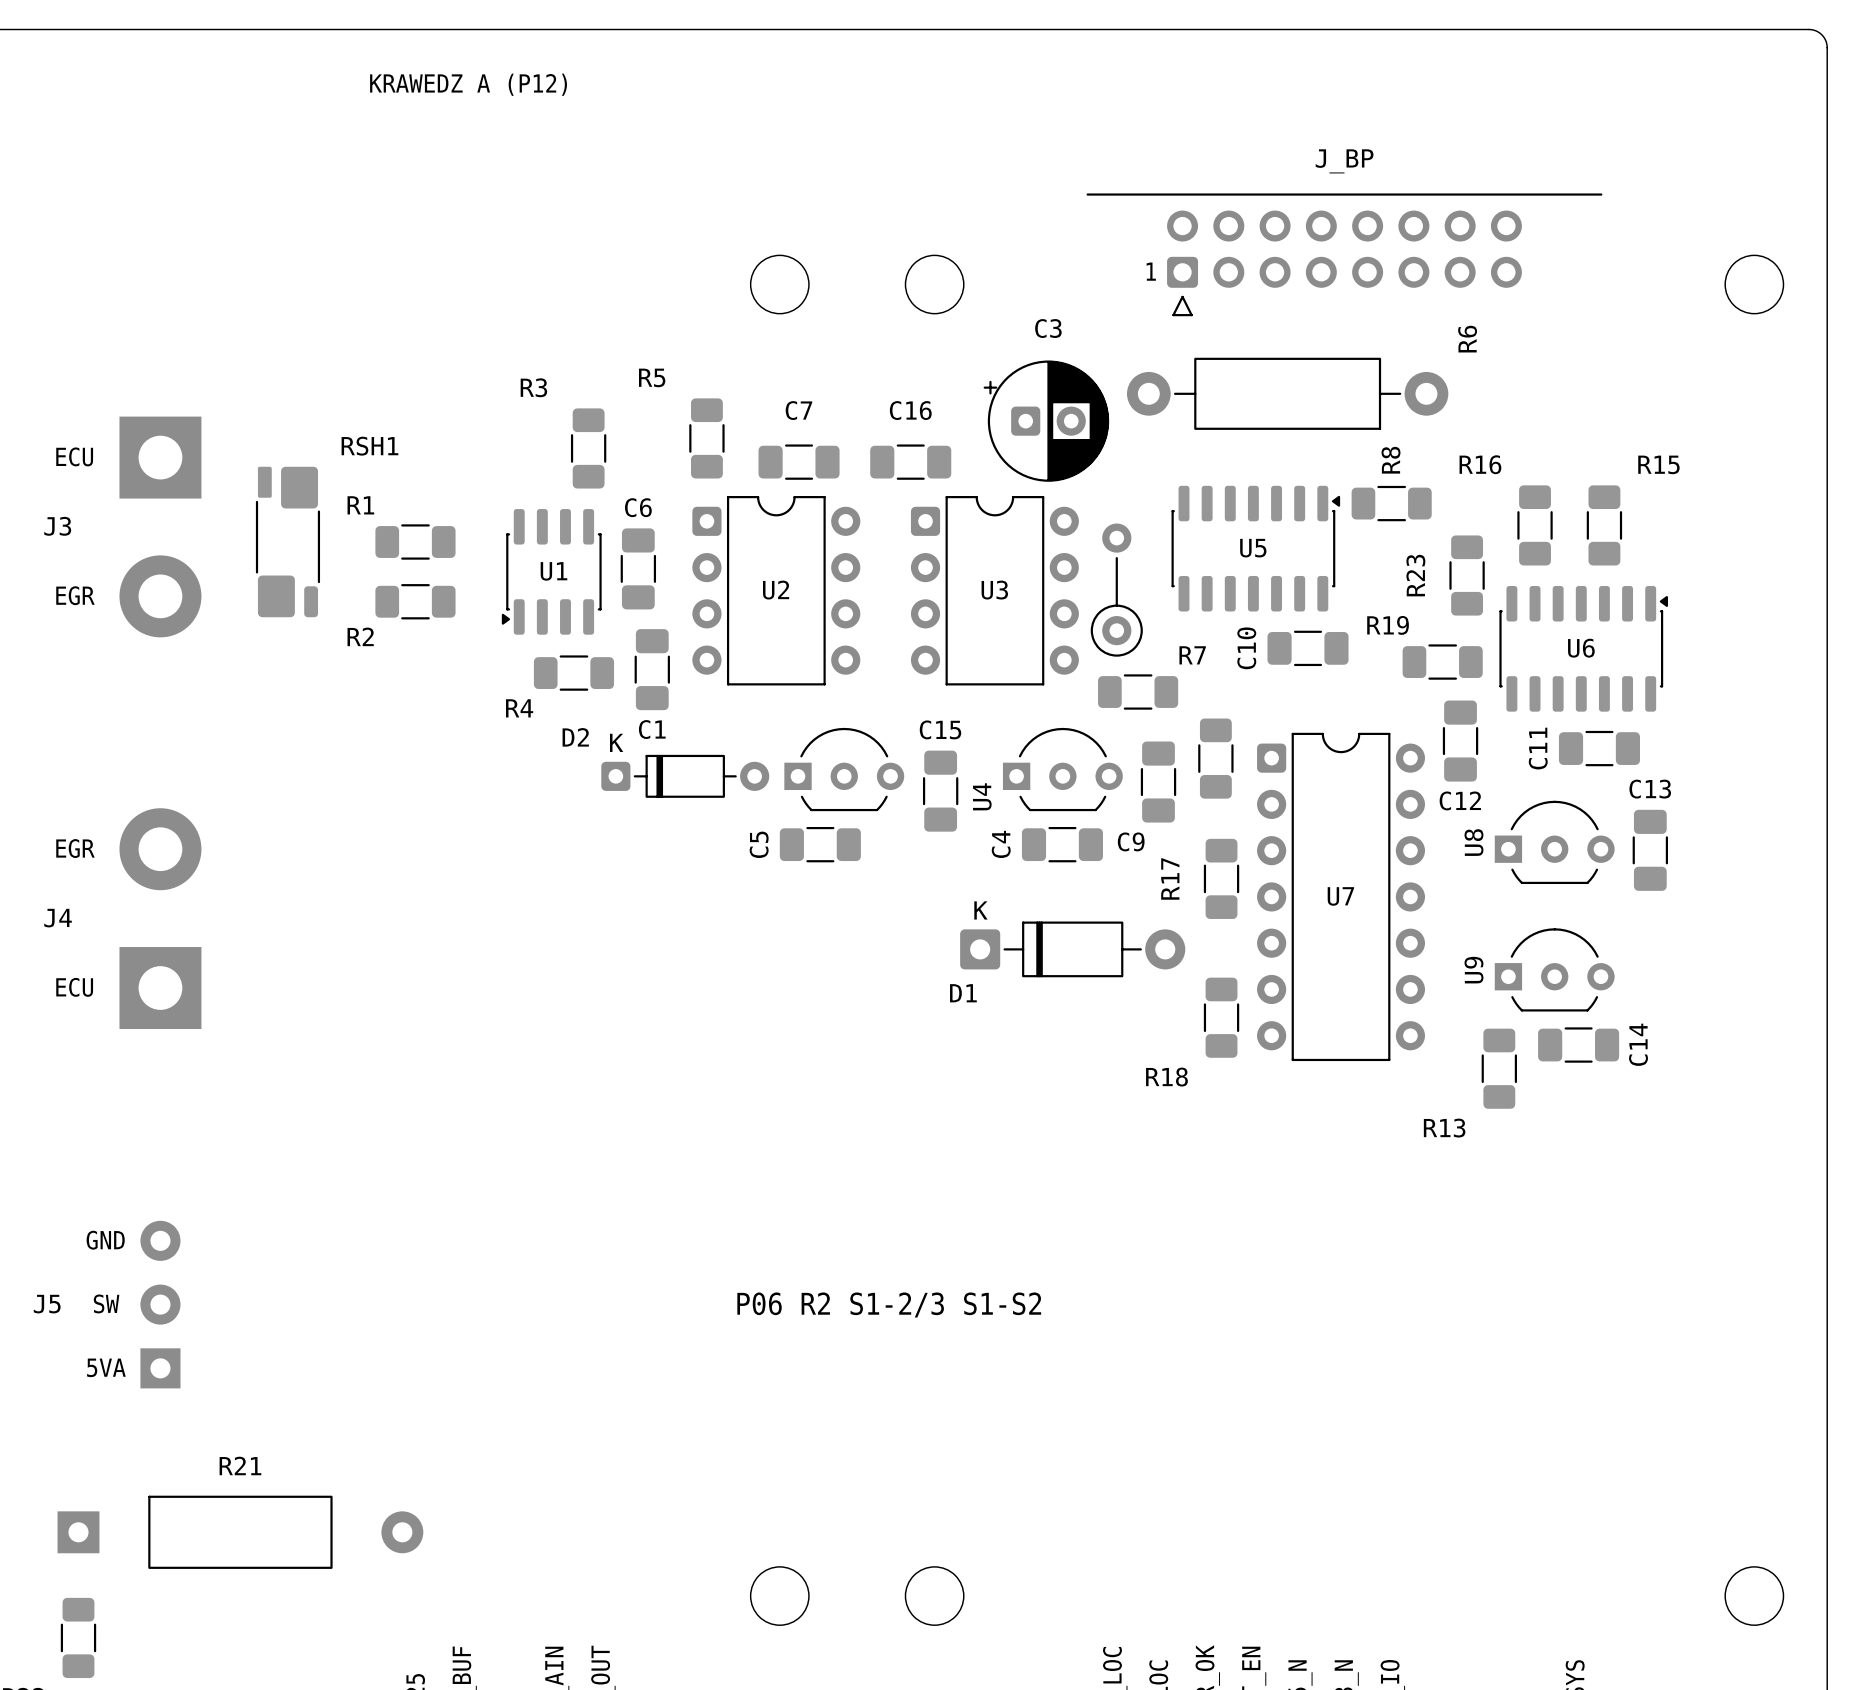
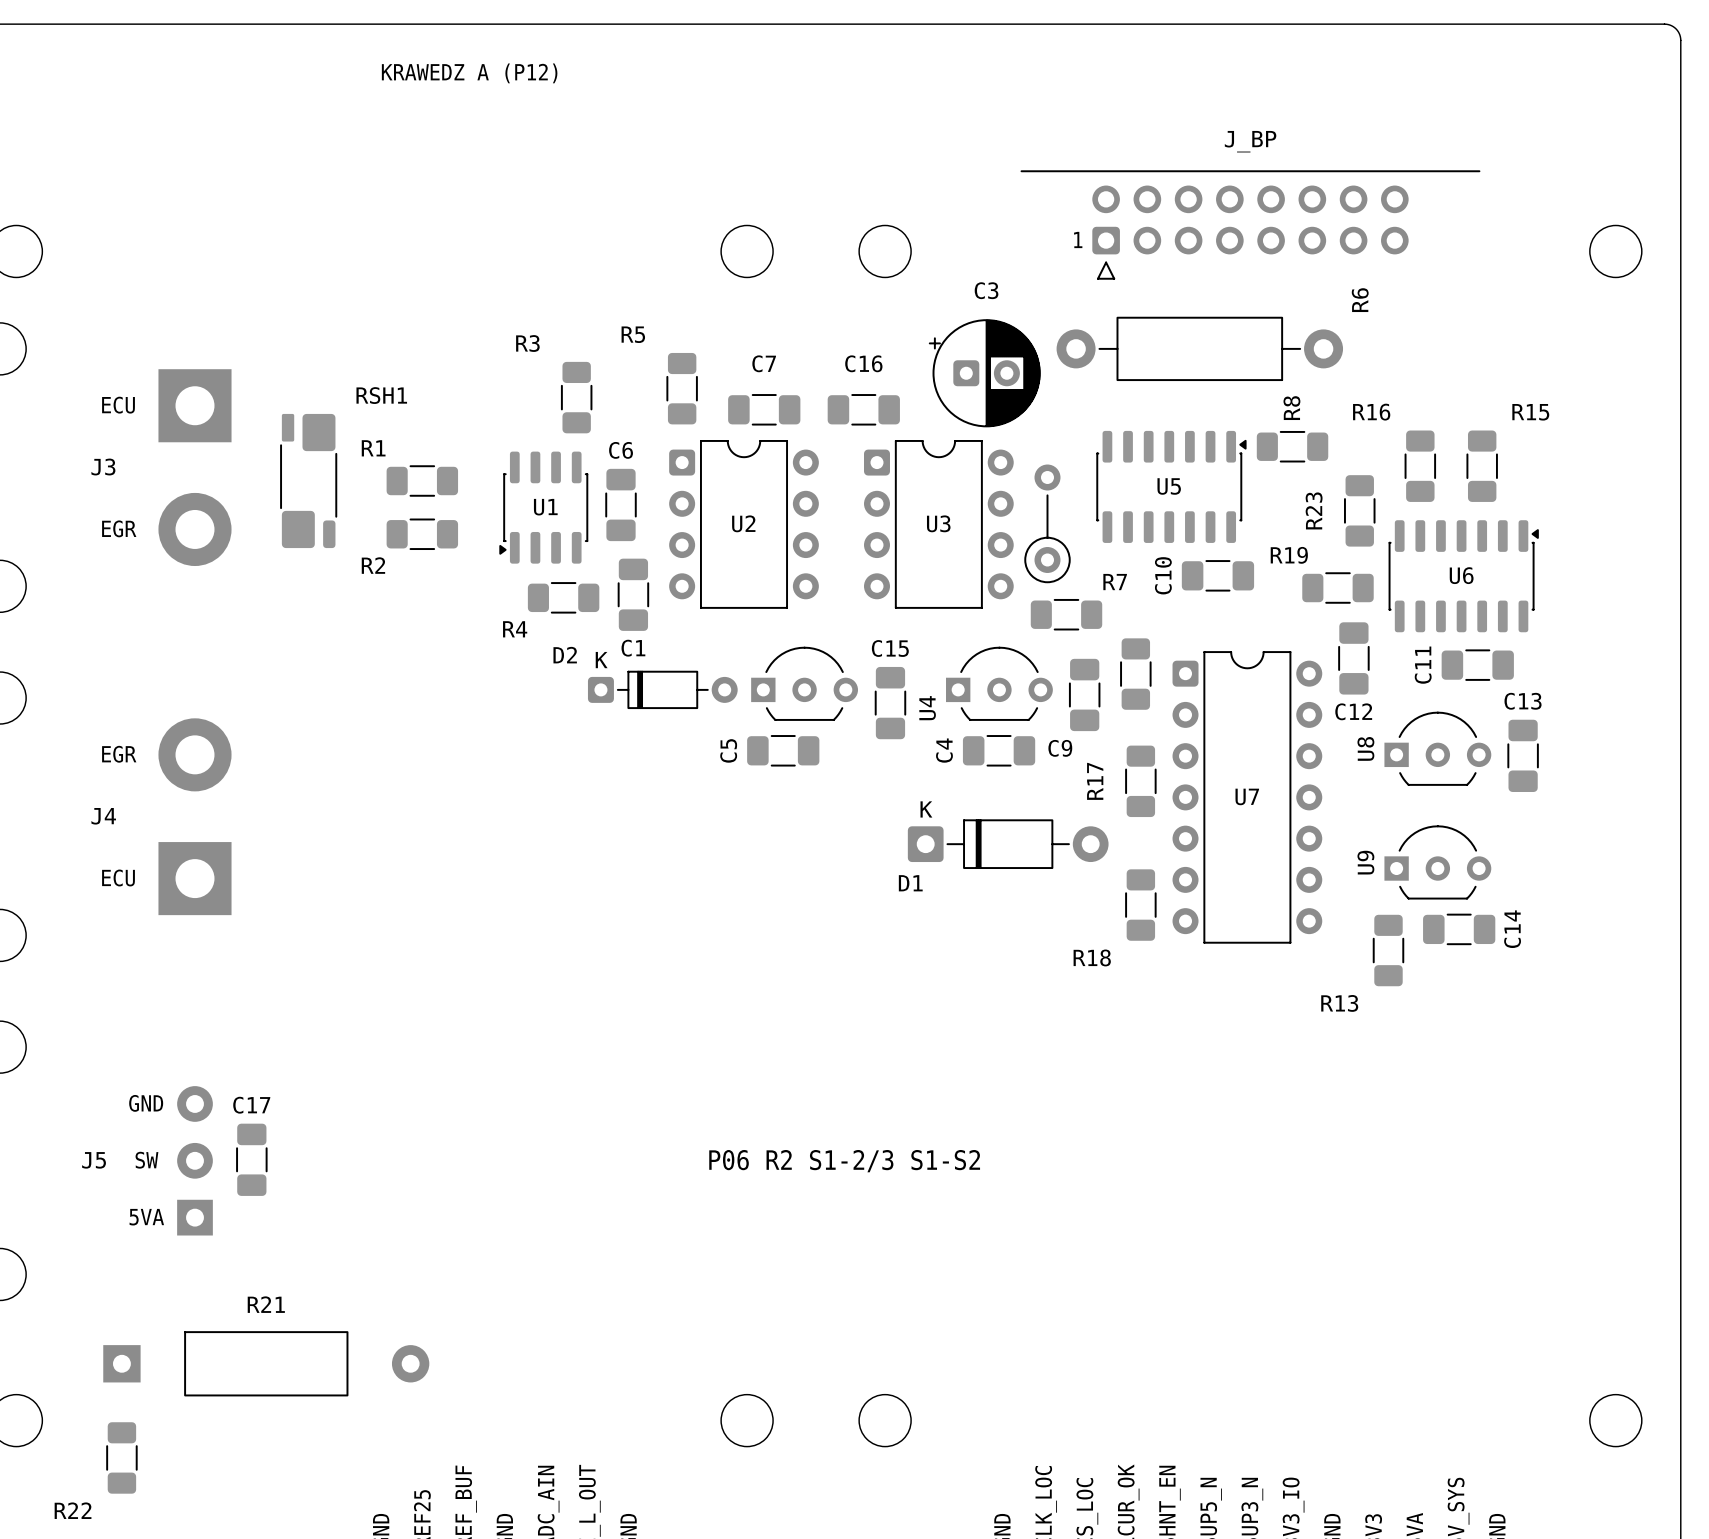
C17: none -> (251, 1159)

